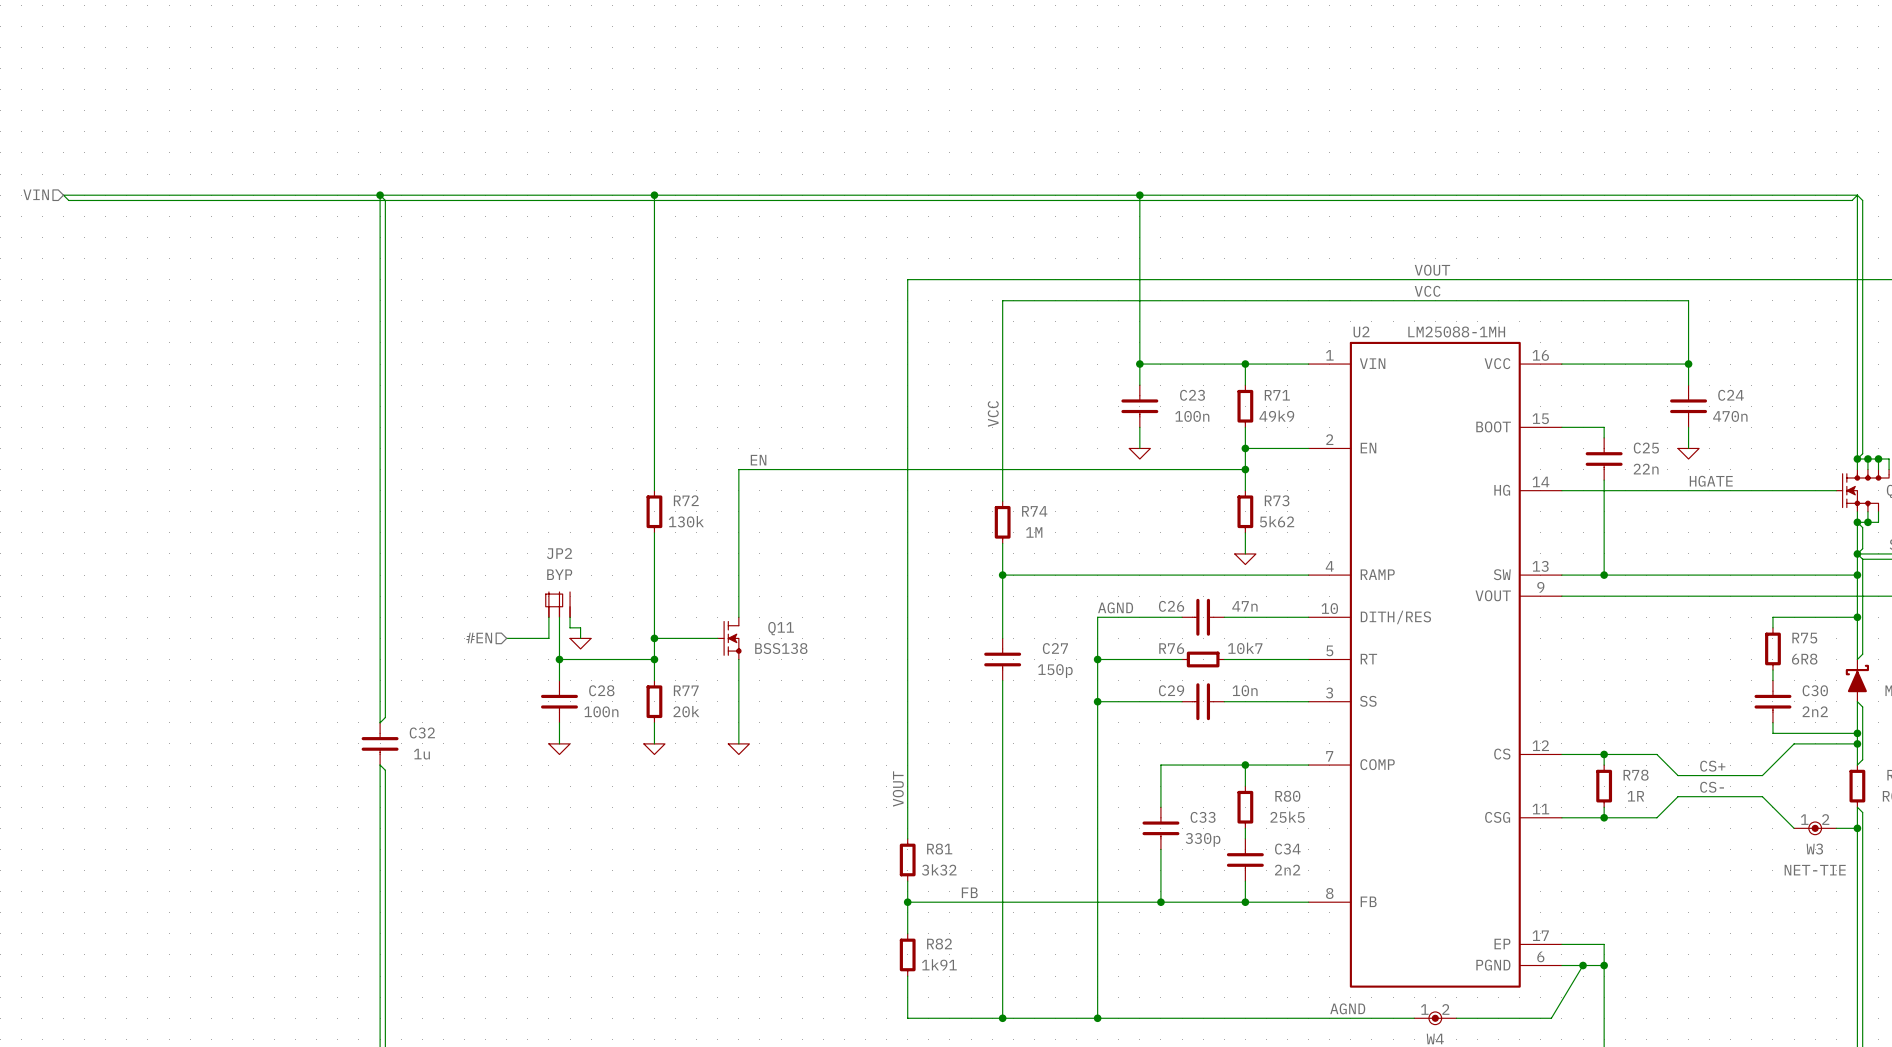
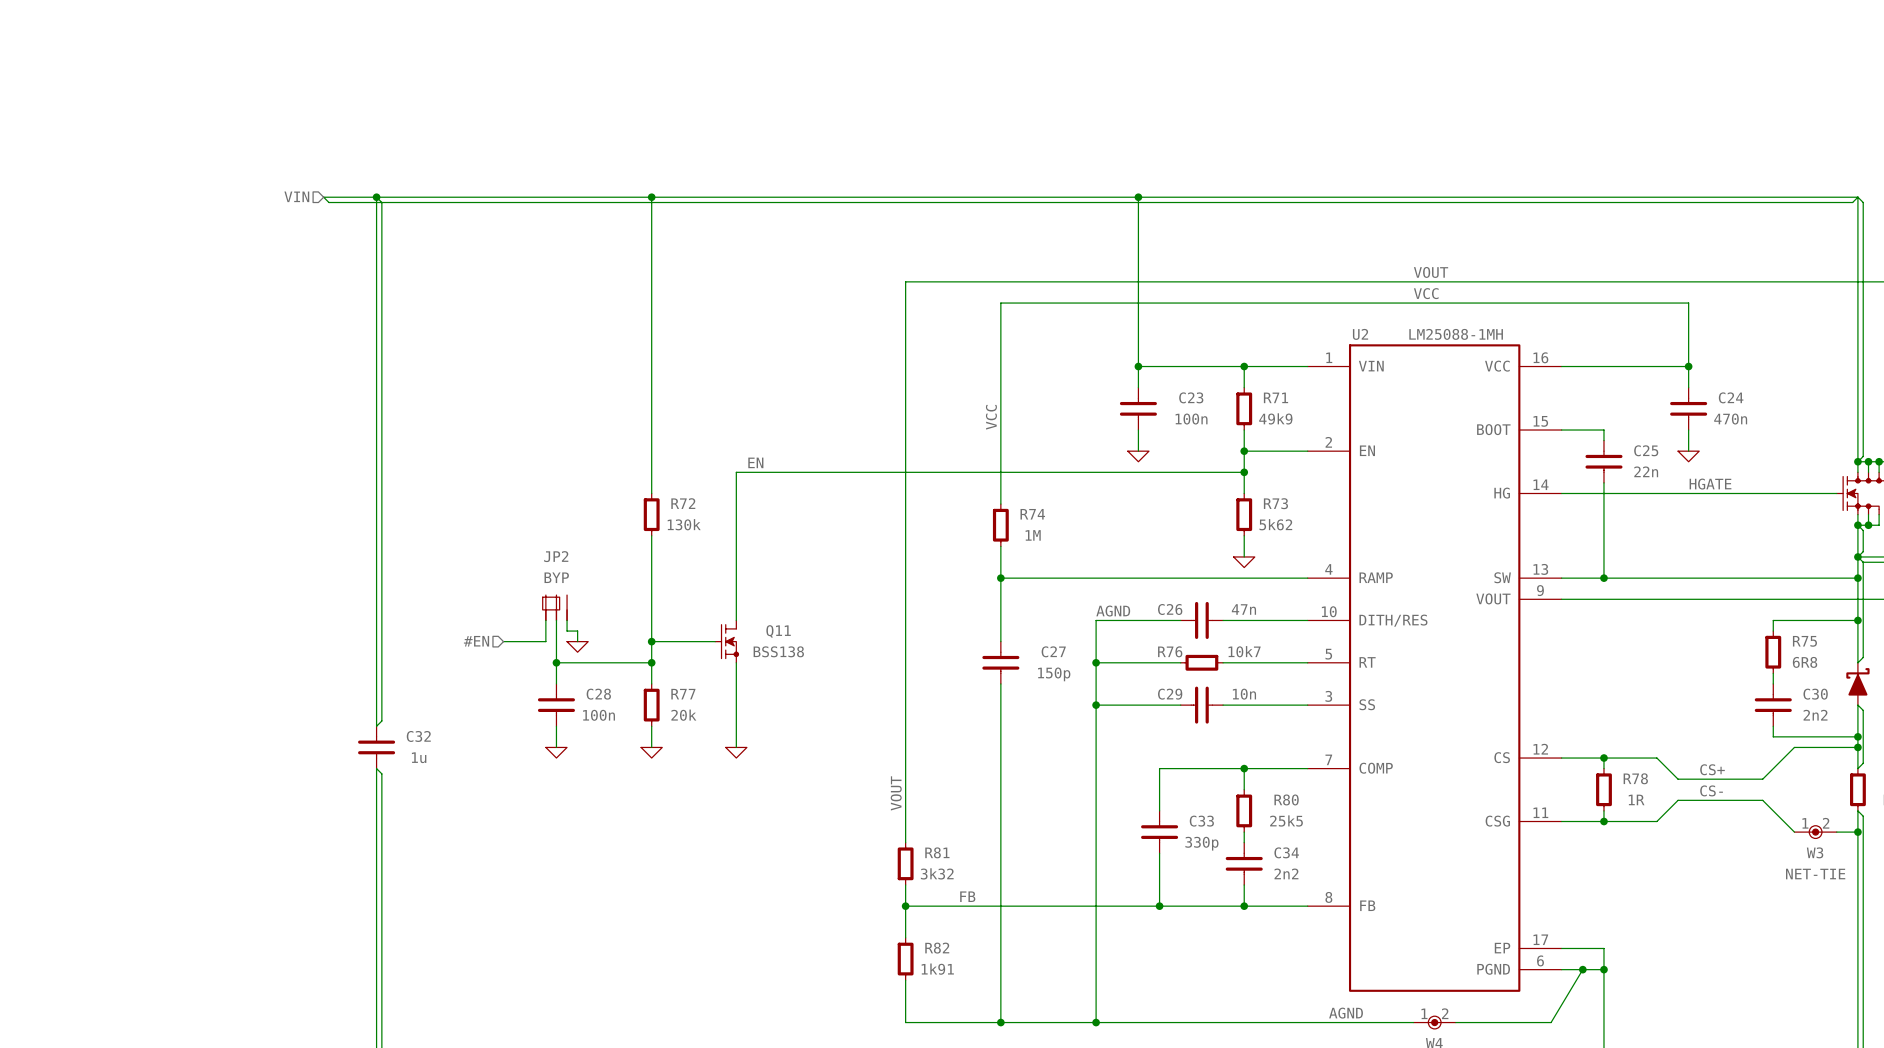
hierarchical label: VIN (36, 194) -> none
hierarchical label: none -> VIN (296, 196)
wire: (327, 195) (63, 195) (68, 200) (332, 200) -> (323, 197) (328, 202)

